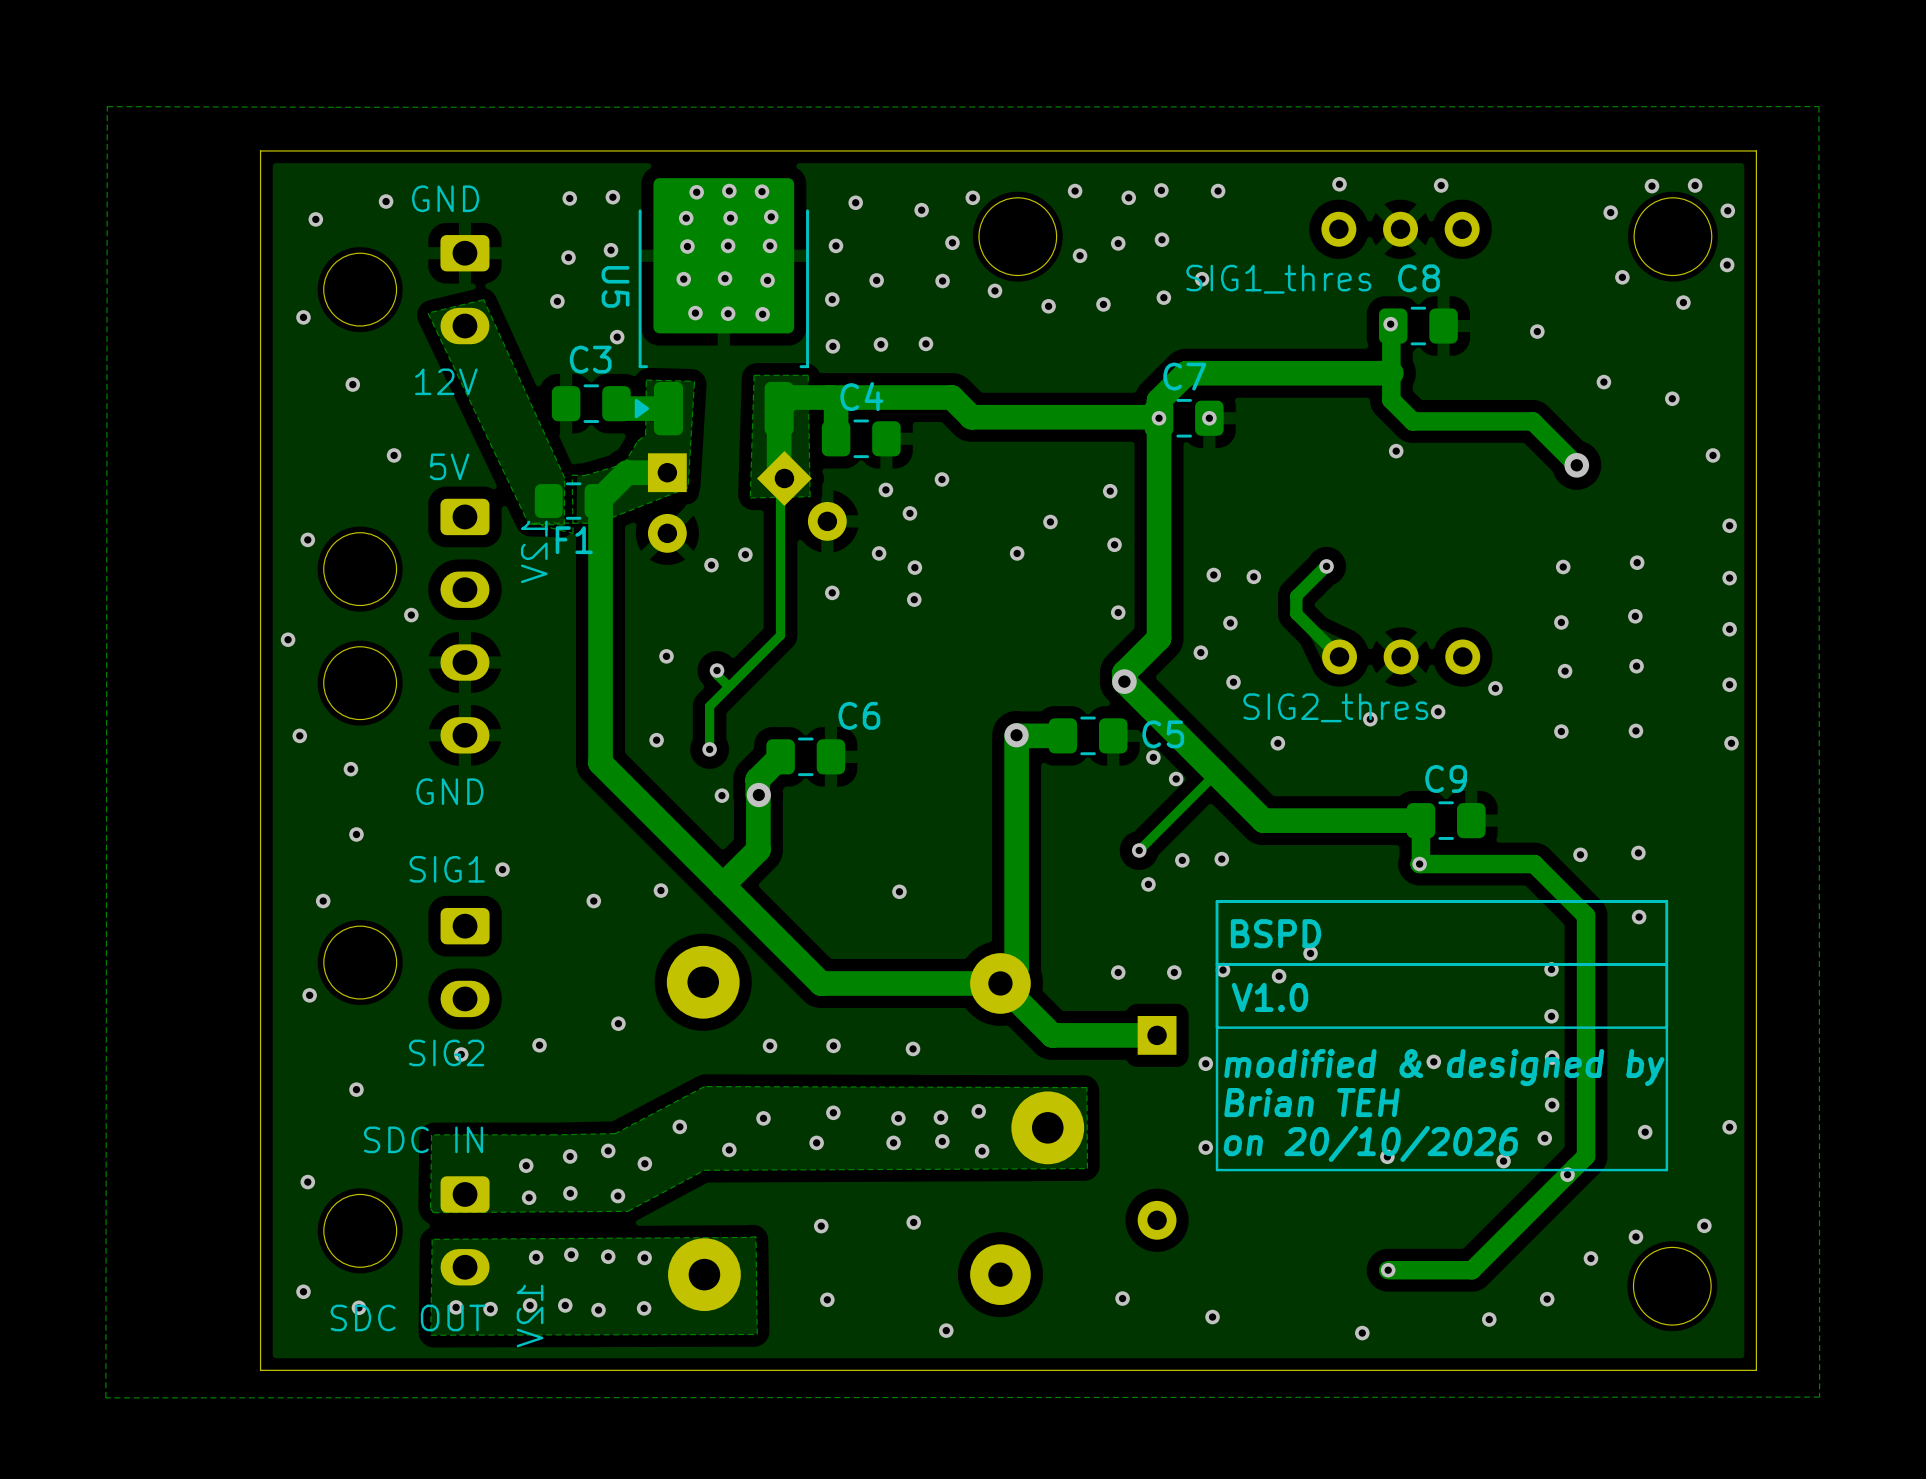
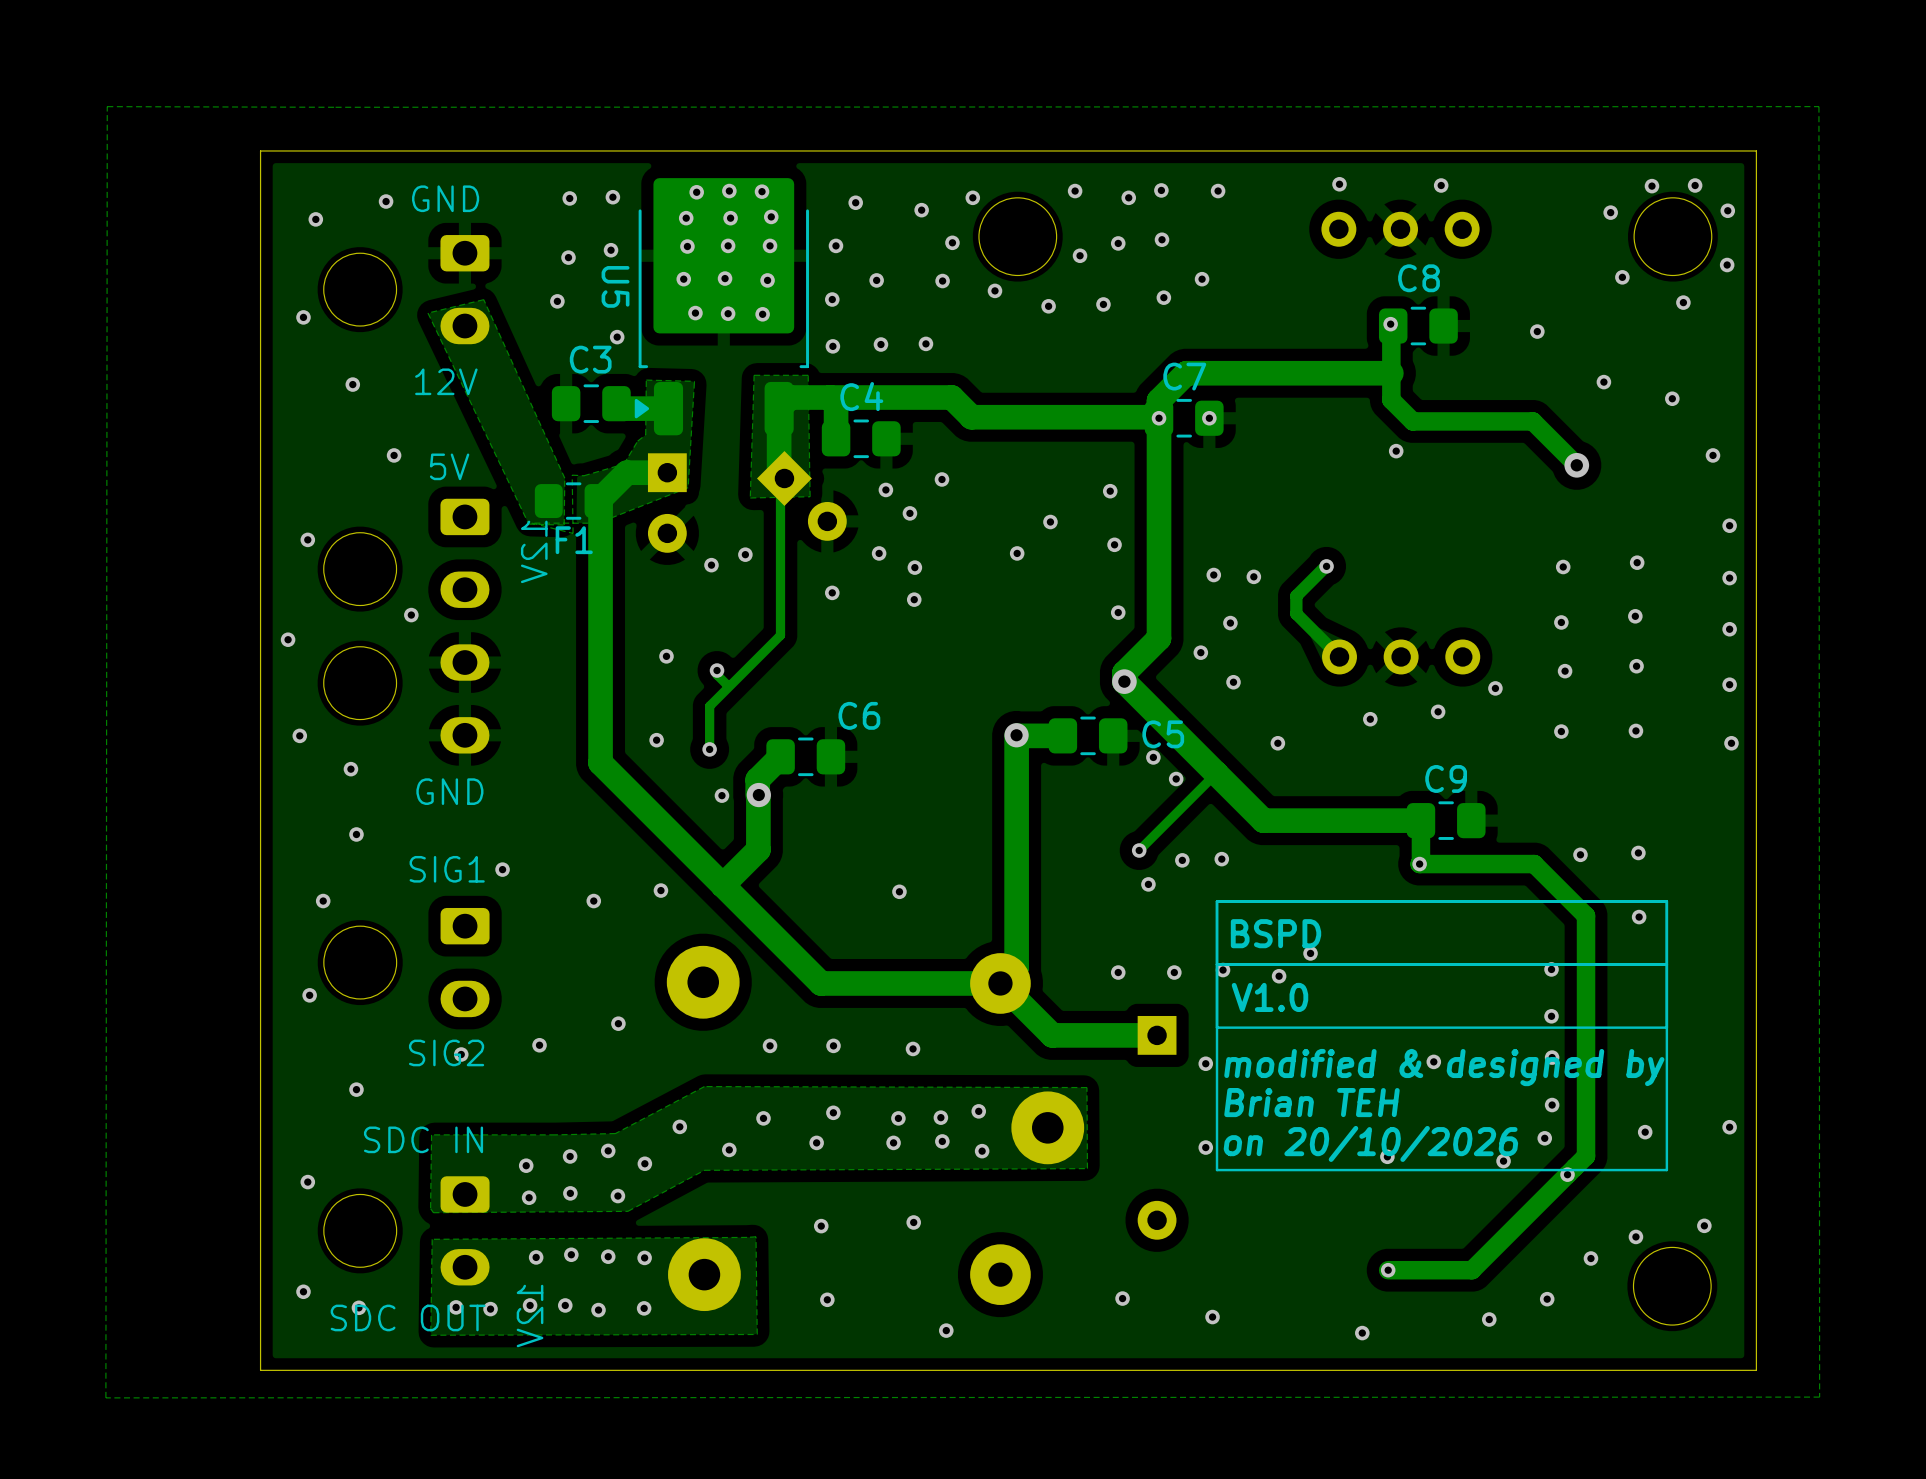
text: SIG1_thres (1278, 279) -> none
text: SIG2_thres (1335, 707) -> none

